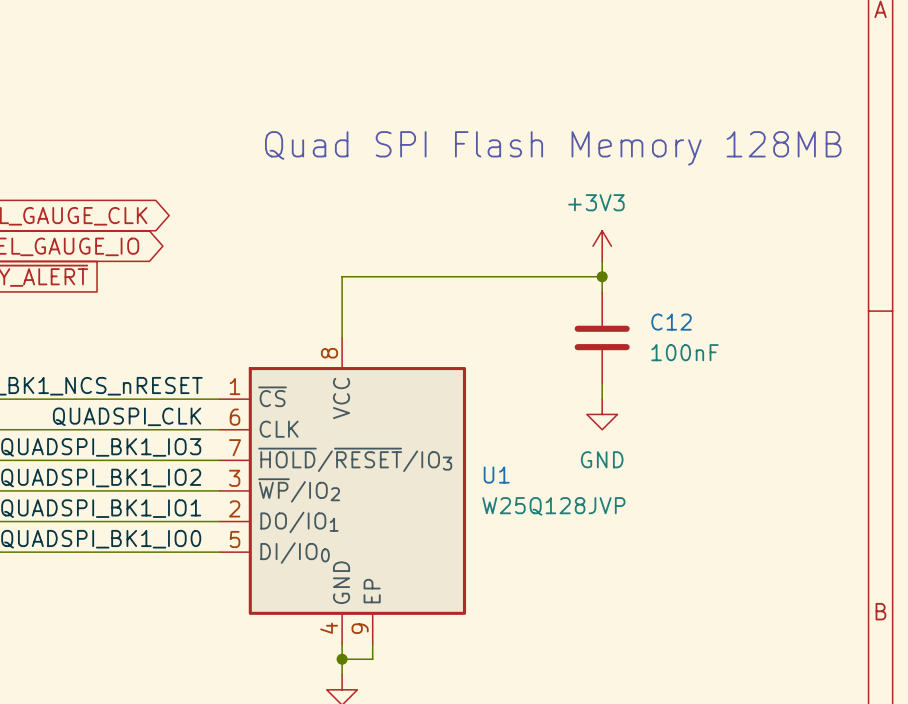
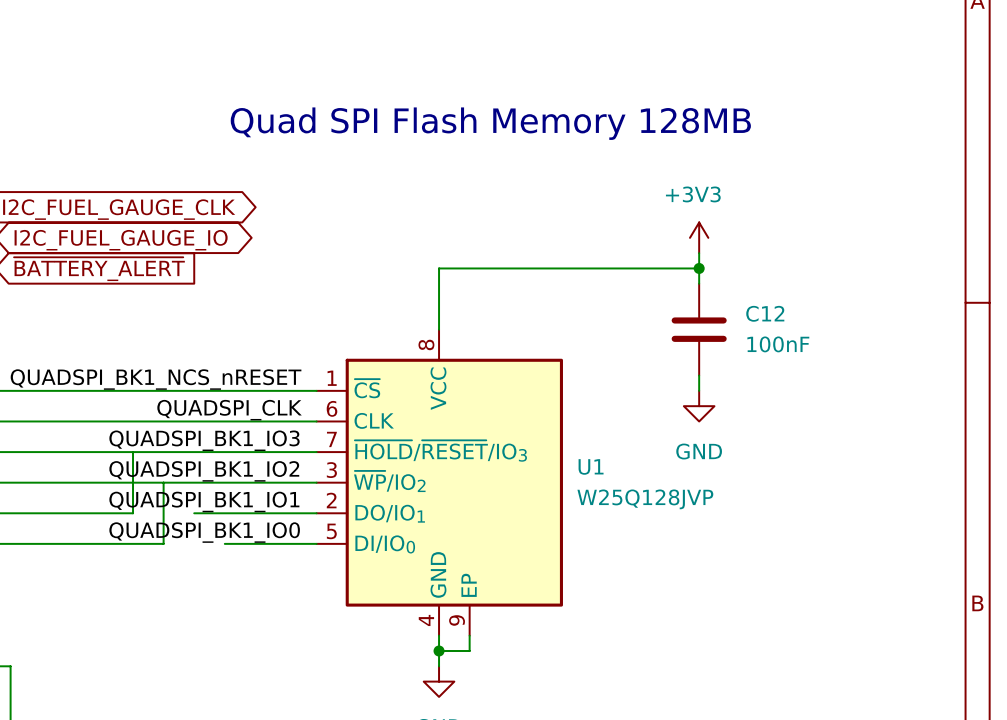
text position: Quad SPI Flash Memory 128MB (553, 148) -> Quad SPI Flash Memory 128MB (490, 123)
wire: (36, 521) (97, 521) -> (133, 513) (133, 452)
wire: (66, 552) (127, 552) -> (163, 543) (163, 482)

